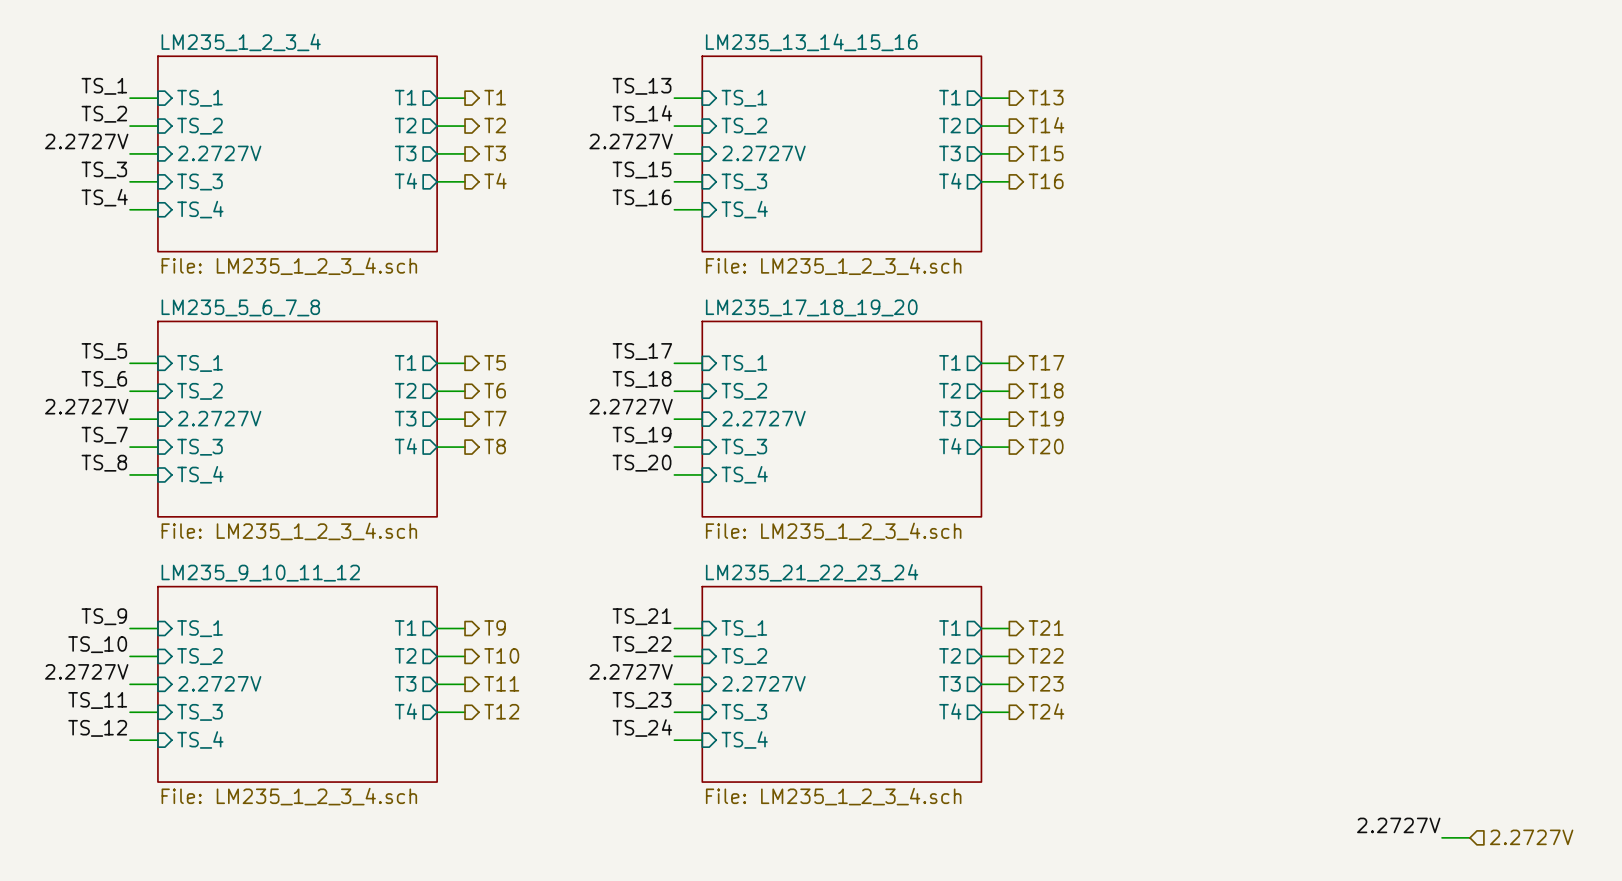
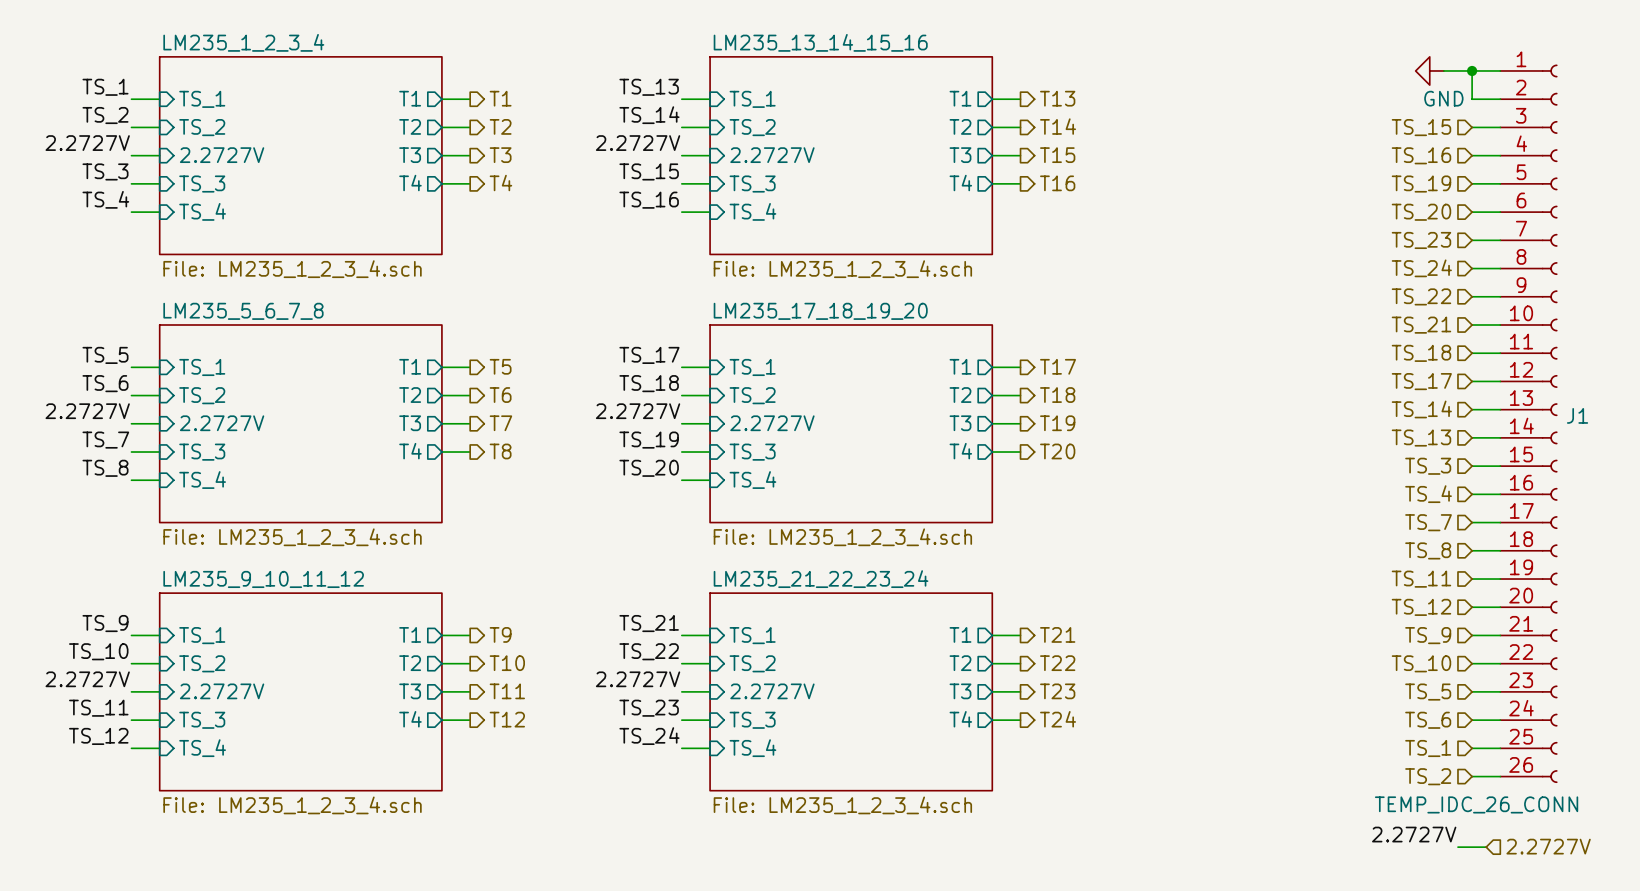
power symbol: none -> GND (1429, 70)
wire: none -> (1443, 70) (1500, 70)
wire: none -> (1472, 70) (1472, 99) (1500, 99)
junction: none -> (1472, 70)
hierarchical label: none -> TS_15 (1421, 127)
wire: none -> (1472, 127) (1500, 127)
wire: none -> (1472, 155) (1500, 155)
hierarchical label: none -> TS_16 (1421, 155)
wire: none -> (1472, 183) (1500, 183)
hierarchical label: none -> TS_19 (1421, 184)
hierarchical label: none -> TS_20 (1421, 212)
wire: none -> (1472, 212) (1500, 212)
hierarchical label: none -> TS_23 (1421, 240)
wire: none -> (1472, 240) (1500, 240)
hierarchical label: none -> TS_24 (1421, 268)
wire: none -> (1472, 268) (1500, 268)
hierarchical label: none -> TS_22 (1421, 296)
wire: none -> (1472, 296) (1500, 296)
hierarchical label: none -> TS_21 (1421, 325)
wire: none -> (1472, 325) (1500, 325)
hierarchical label: none -> TS_18 (1421, 353)
wire: none -> (1472, 353) (1500, 353)
hierarchical label: none -> TS_17 (1421, 381)
wire: none -> (1472, 381) (1500, 381)
hierarchical label: none -> TS_14 (1421, 409)
wire: none -> (1472, 409) (1500, 409)
J1: none -> TEMP_IDC_26_CONN (1528, 423)
hierarchical label: none -> TS_13 (1421, 438)
wire: none -> (1472, 437) (1500, 437)
hierarchical label: none -> TS_3 (1428, 466)
wire: none -> (1472, 466) (1500, 466)
hierarchical label: none -> TS_4 (1428, 494)
wire: none -> (1472, 494) (1500, 494)
hierarchical label: none -> TS_7 (1428, 522)
wire: none -> (1472, 522) (1500, 522)
hierarchical label: none -> TS_8 (1428, 550)
wire: none -> (1472, 550) (1500, 550)
hierarchical label: none -> TS_11 (1421, 579)
wire: none -> (1472, 579) (1500, 579)
hierarchical label: none -> TS_12 (1421, 607)
wire: none -> (1472, 607) (1500, 607)
hierarchical label: none -> TS_9 (1428, 635)
wire: none -> (1472, 635) (1500, 635)
hierarchical label: none -> TS_10 (1421, 663)
wire: none -> (1472, 663) (1500, 663)
hierarchical label: none -> TS_5 (1428, 692)
wire: none -> (1472, 691) (1500, 691)
hierarchical label: none -> TS_6 (1428, 720)
wire: none -> (1472, 720) (1500, 720)
hierarchical label: none -> TS_1 (1428, 748)
wire: none -> (1472, 748) (1500, 748)
hierarchical label: none -> TS_2 (1428, 776)
wire: none -> (1472, 776) (1500, 776)

